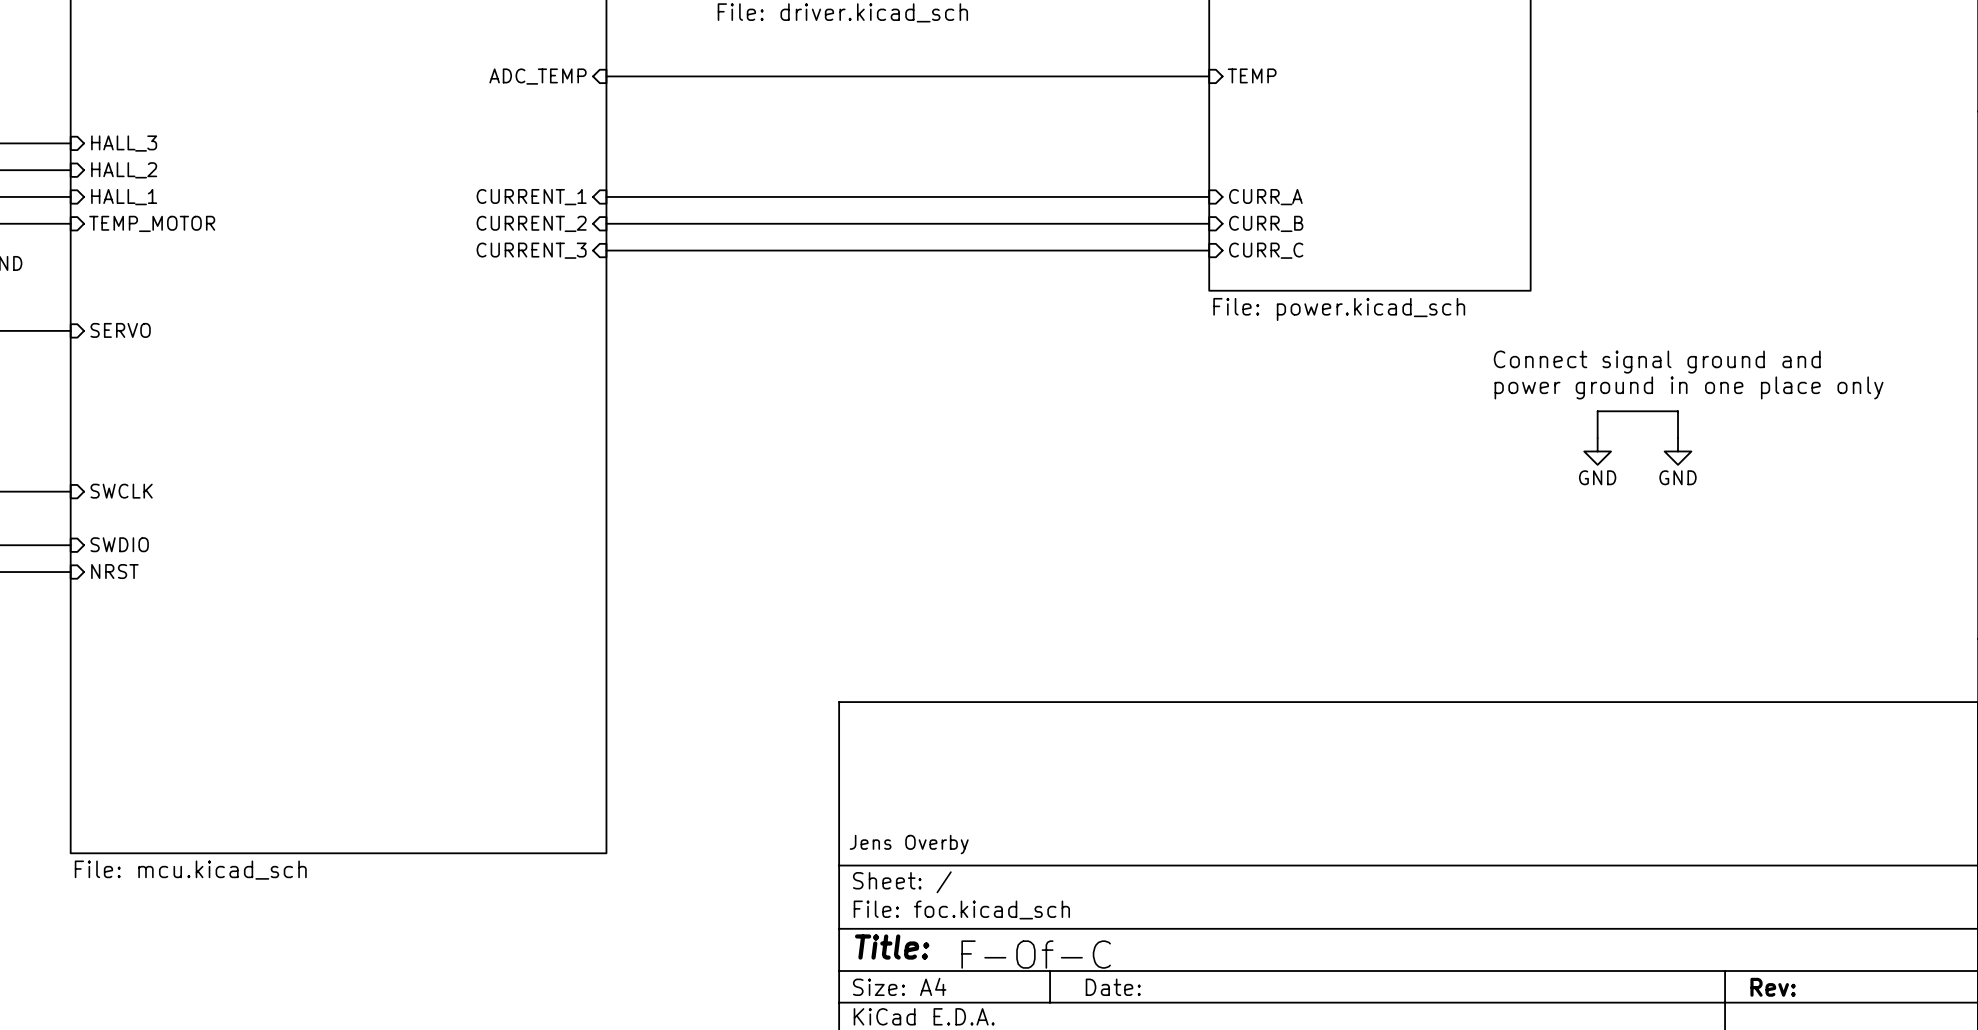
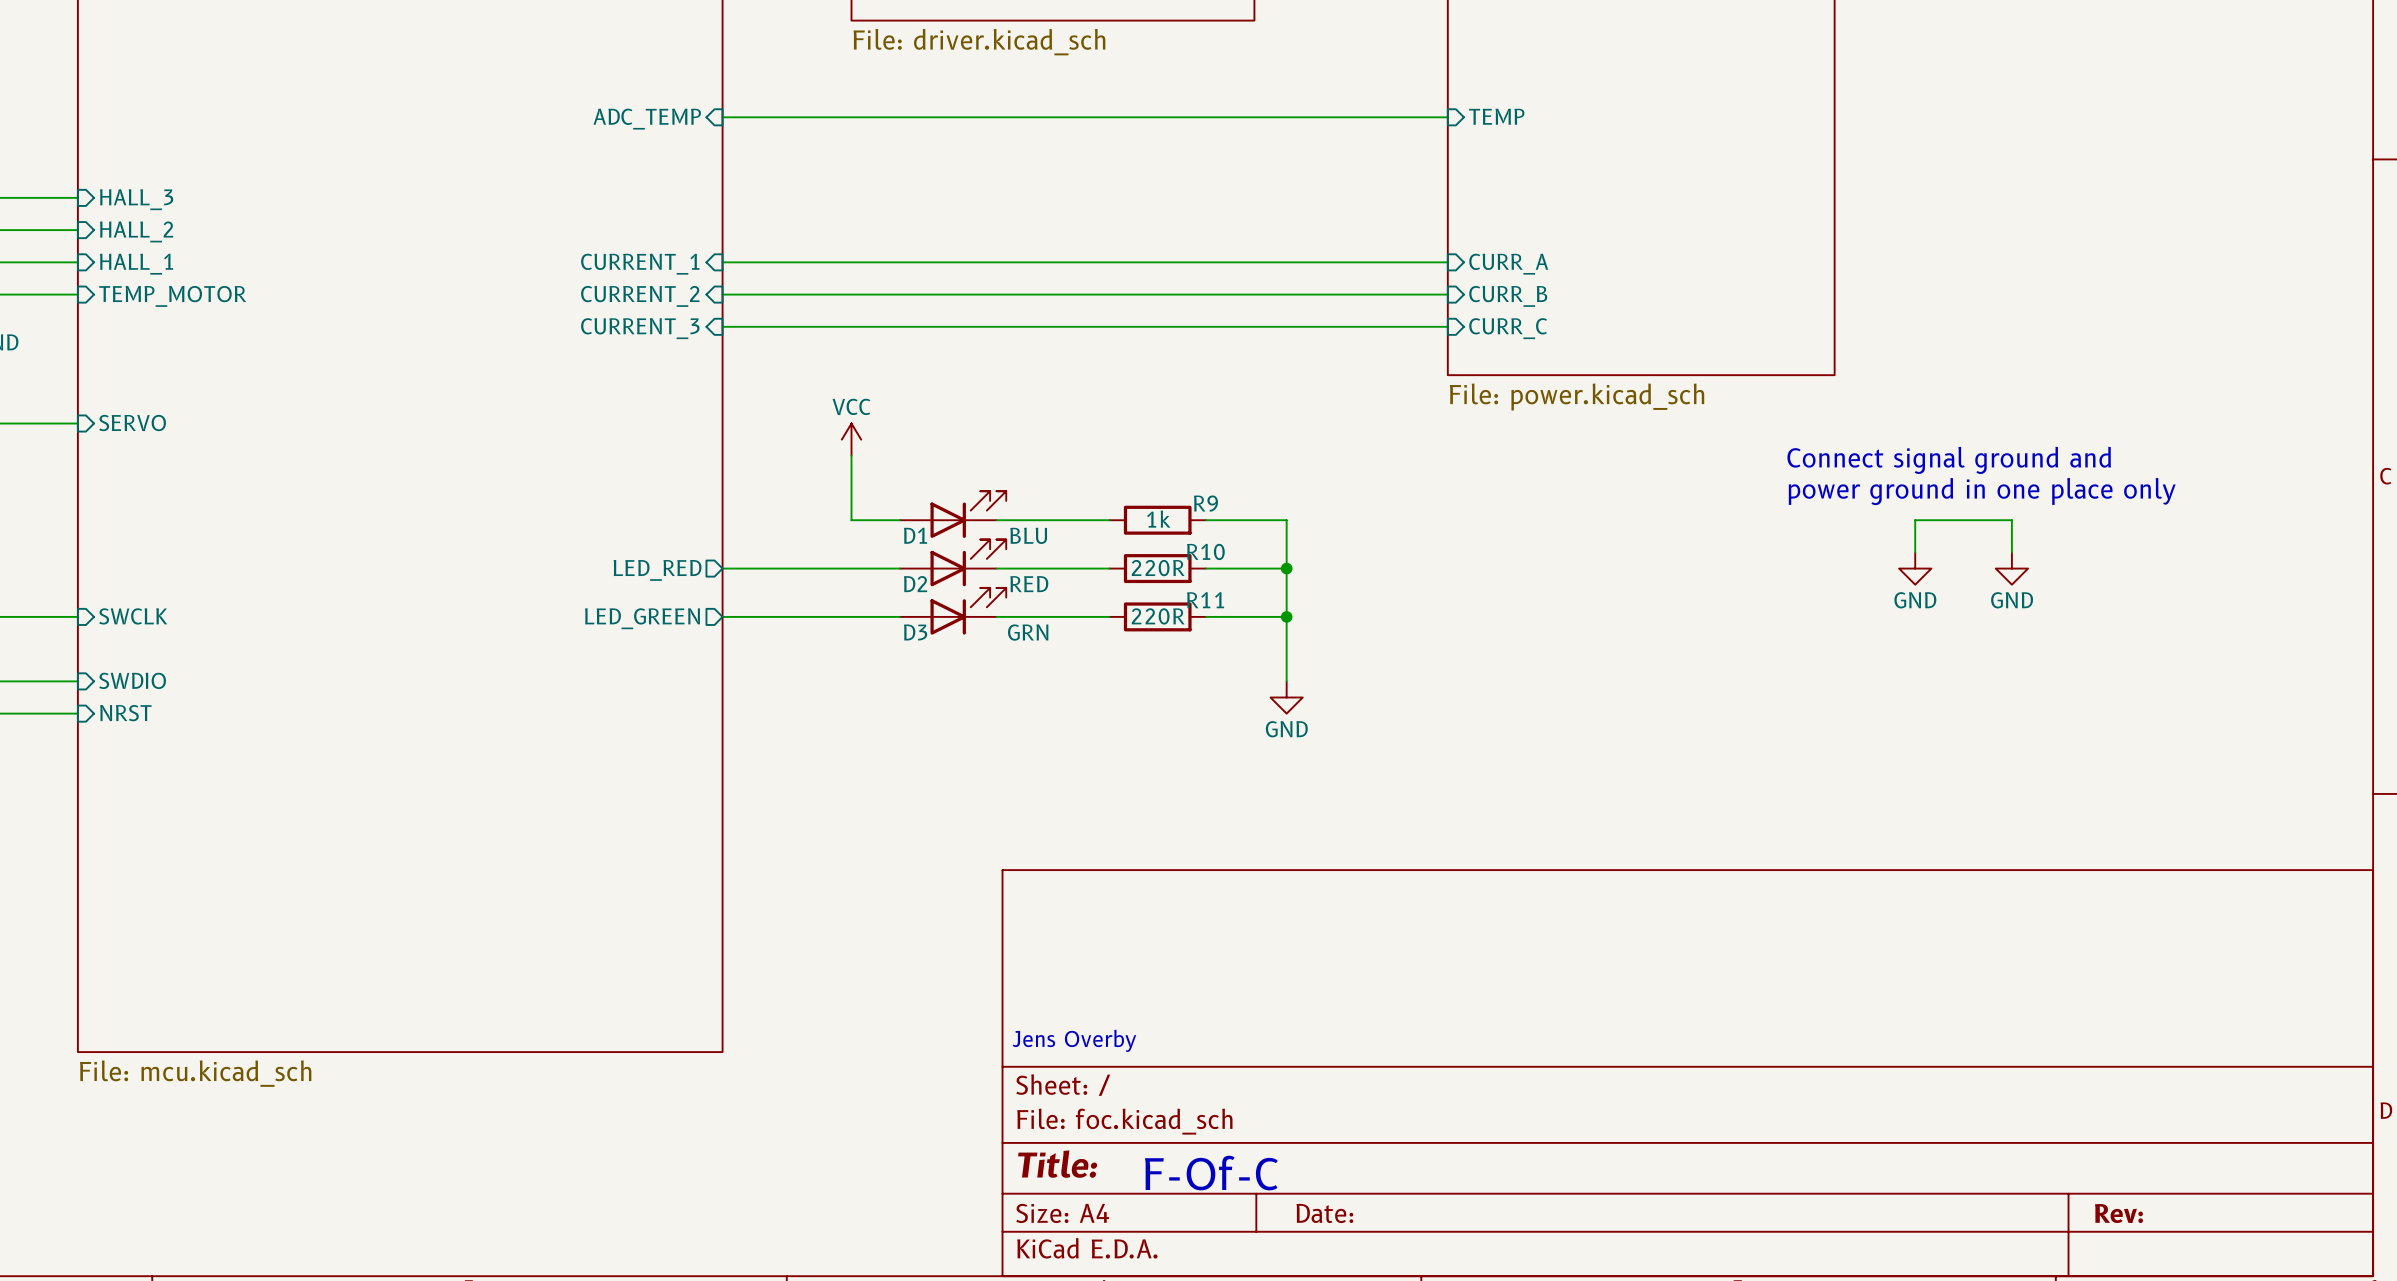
power symbol: none -> VCC (851, 439)
wire: none -> (851, 455) (851, 520) (899, 520)
D1: none -> BLU (953, 514)
wire: none -> (996, 520) (1109, 520)
R9: none -> 1k (1157, 520)
wire: none -> (1206, 520) (1286, 520) (1286, 681)
D2: none -> RED (953, 562)
sheet pin: none -> LED_RED (657, 570)
wire: none -> (722, 568) (899, 568)
wire: none -> (996, 568) (1109, 568)
R10: none -> 220R (1157, 568)
wire: none -> (1206, 568) (1286, 568)
junction: none -> (1286, 568)
D3: none -> GRN (953, 611)
sheet pin: none -> LED_GREEN (642, 618)
wire: none -> (722, 616) (899, 616)
wire: none -> (996, 616) (1109, 616)
R11: none -> 220R (1157, 616)
wire: none -> (1206, 616) (1286, 616)
junction: none -> (1286, 616)
power symbol: none -> GND (1286, 697)

